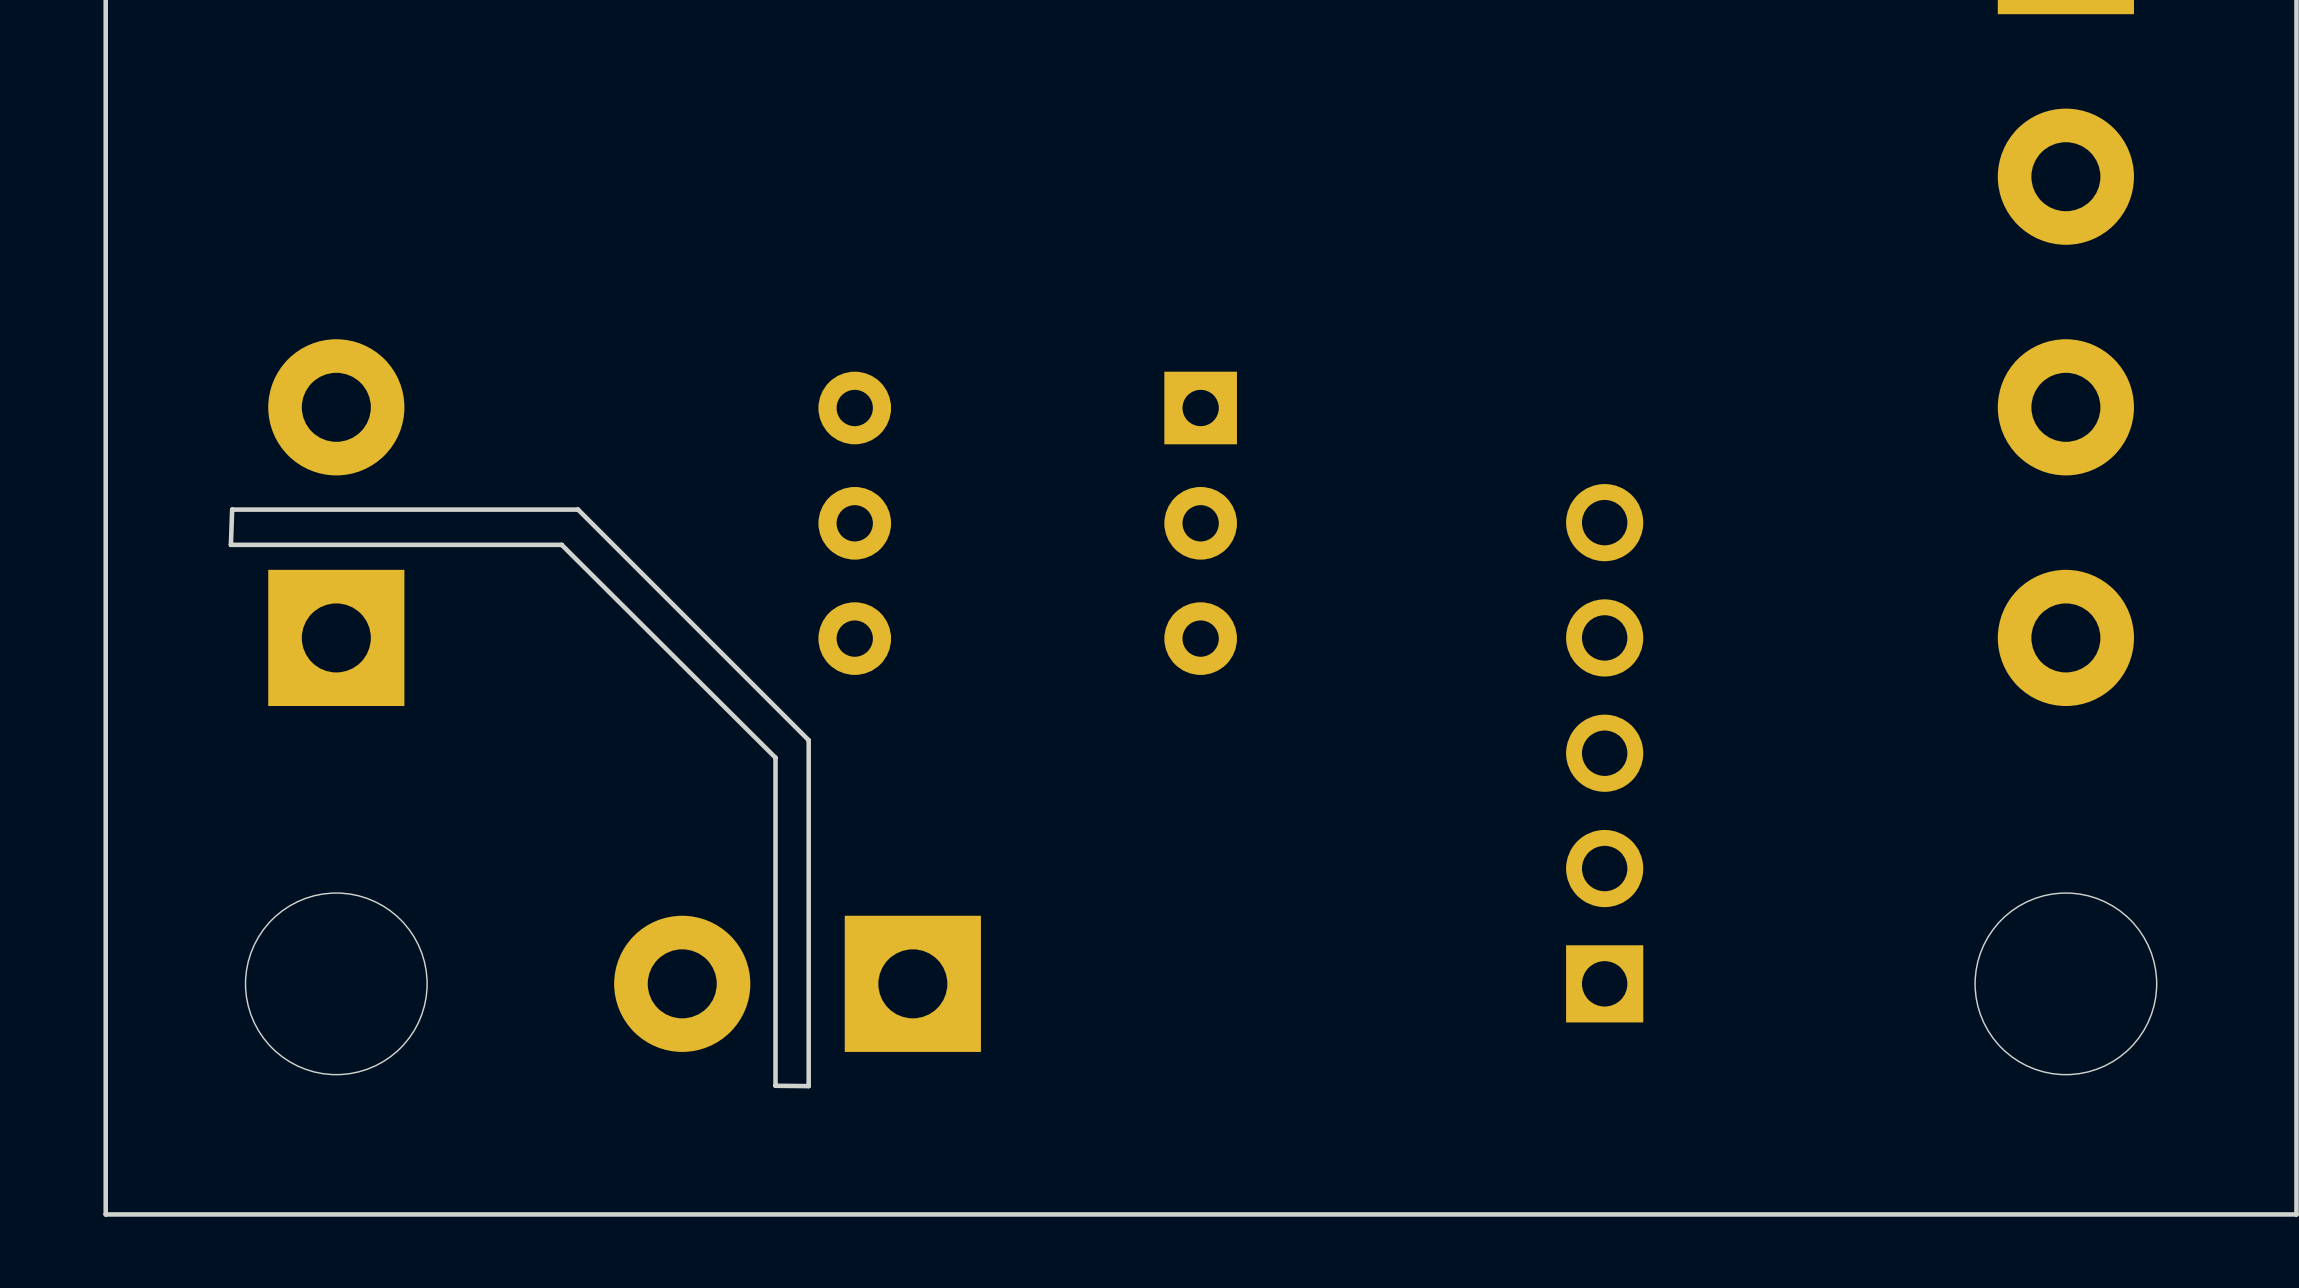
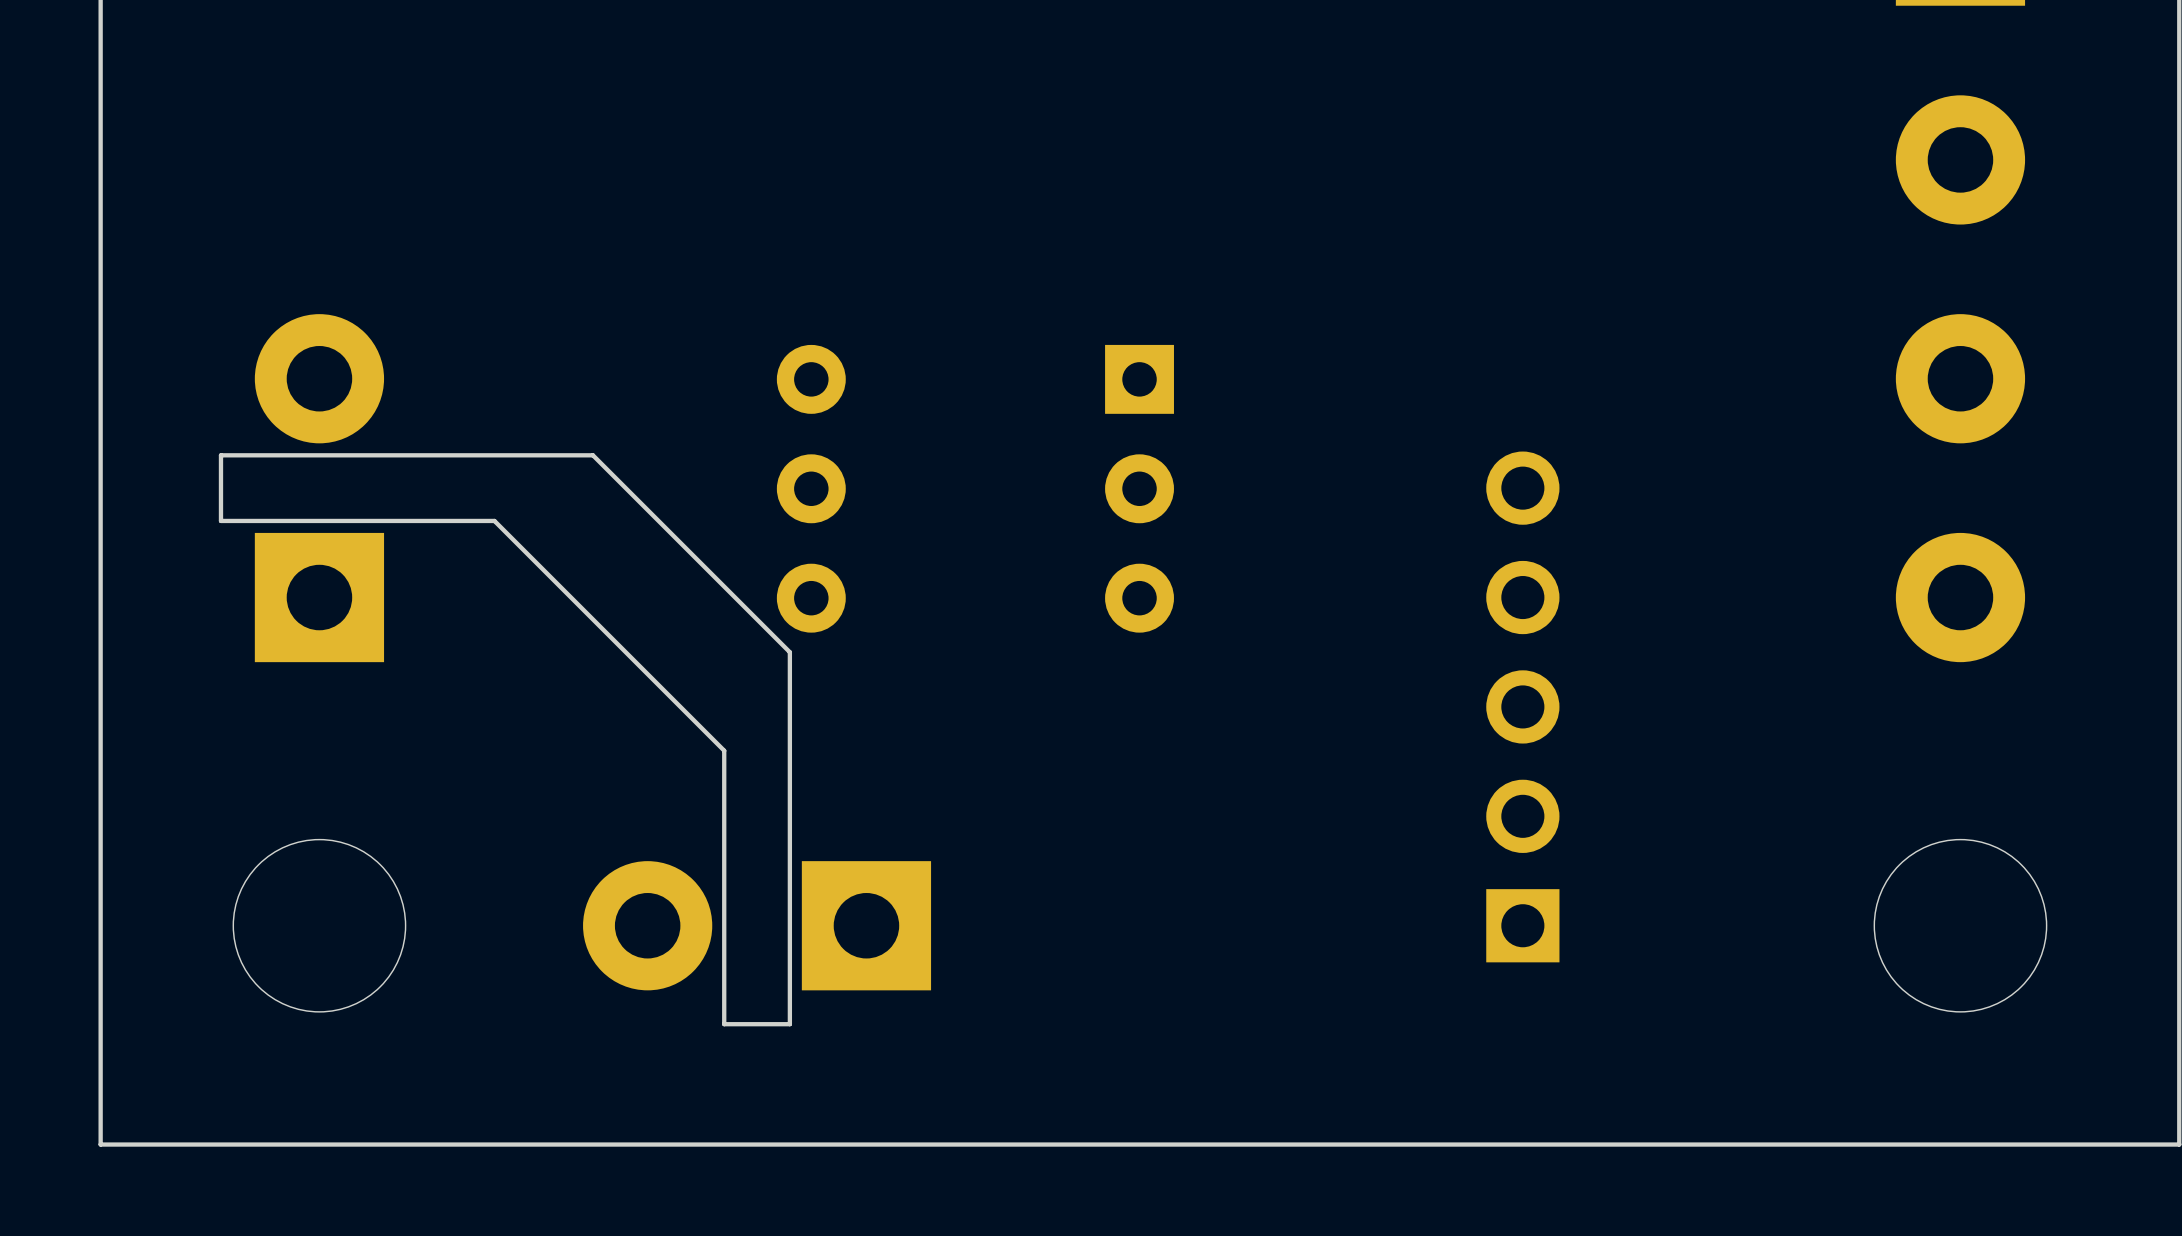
board edge: (578, 509) (232, 509) (230, 544) (561, 544) (775, 757) (775, 1085) (808, 1086) (808, 740) (578, 509) -> (592, 455) (789, 652) (789, 1024) (724, 1024) (724, 750) (494, 520) (220, 520) (220, 455) (592, 455)

